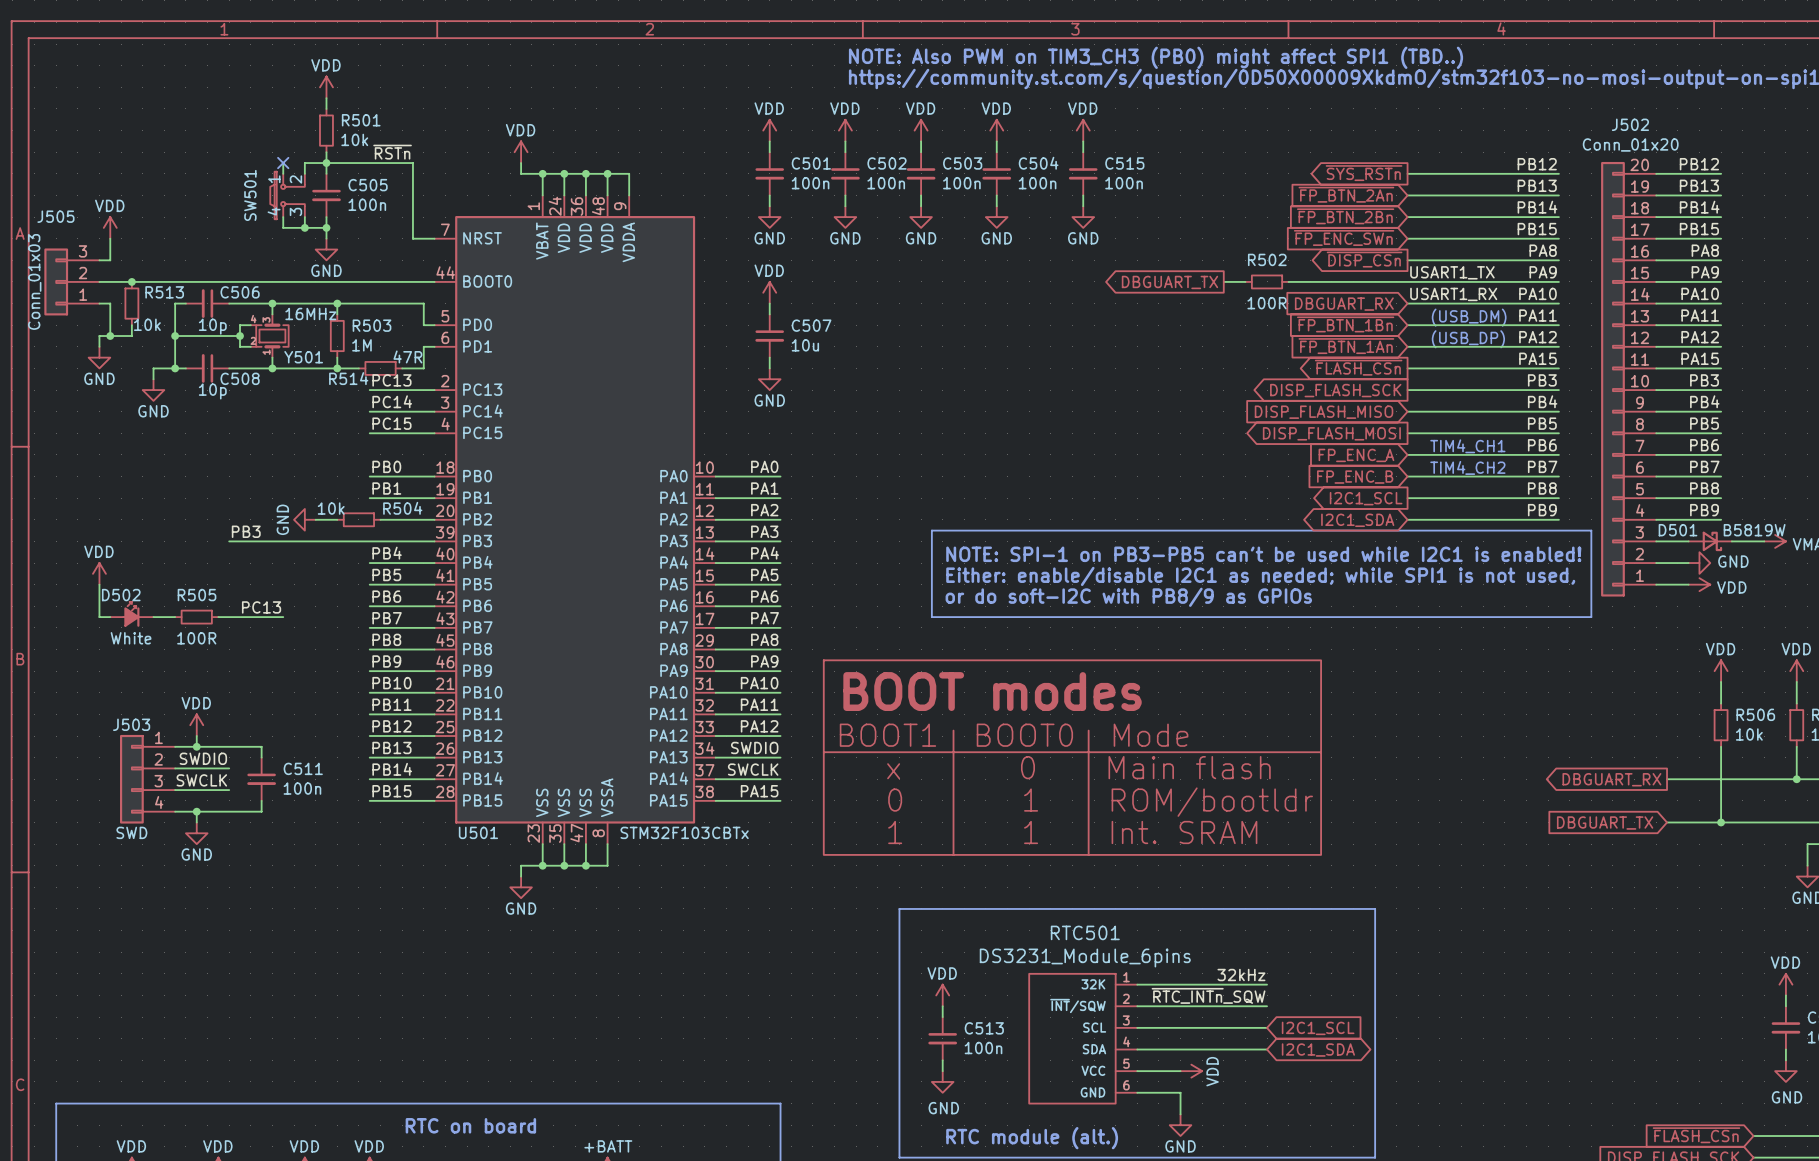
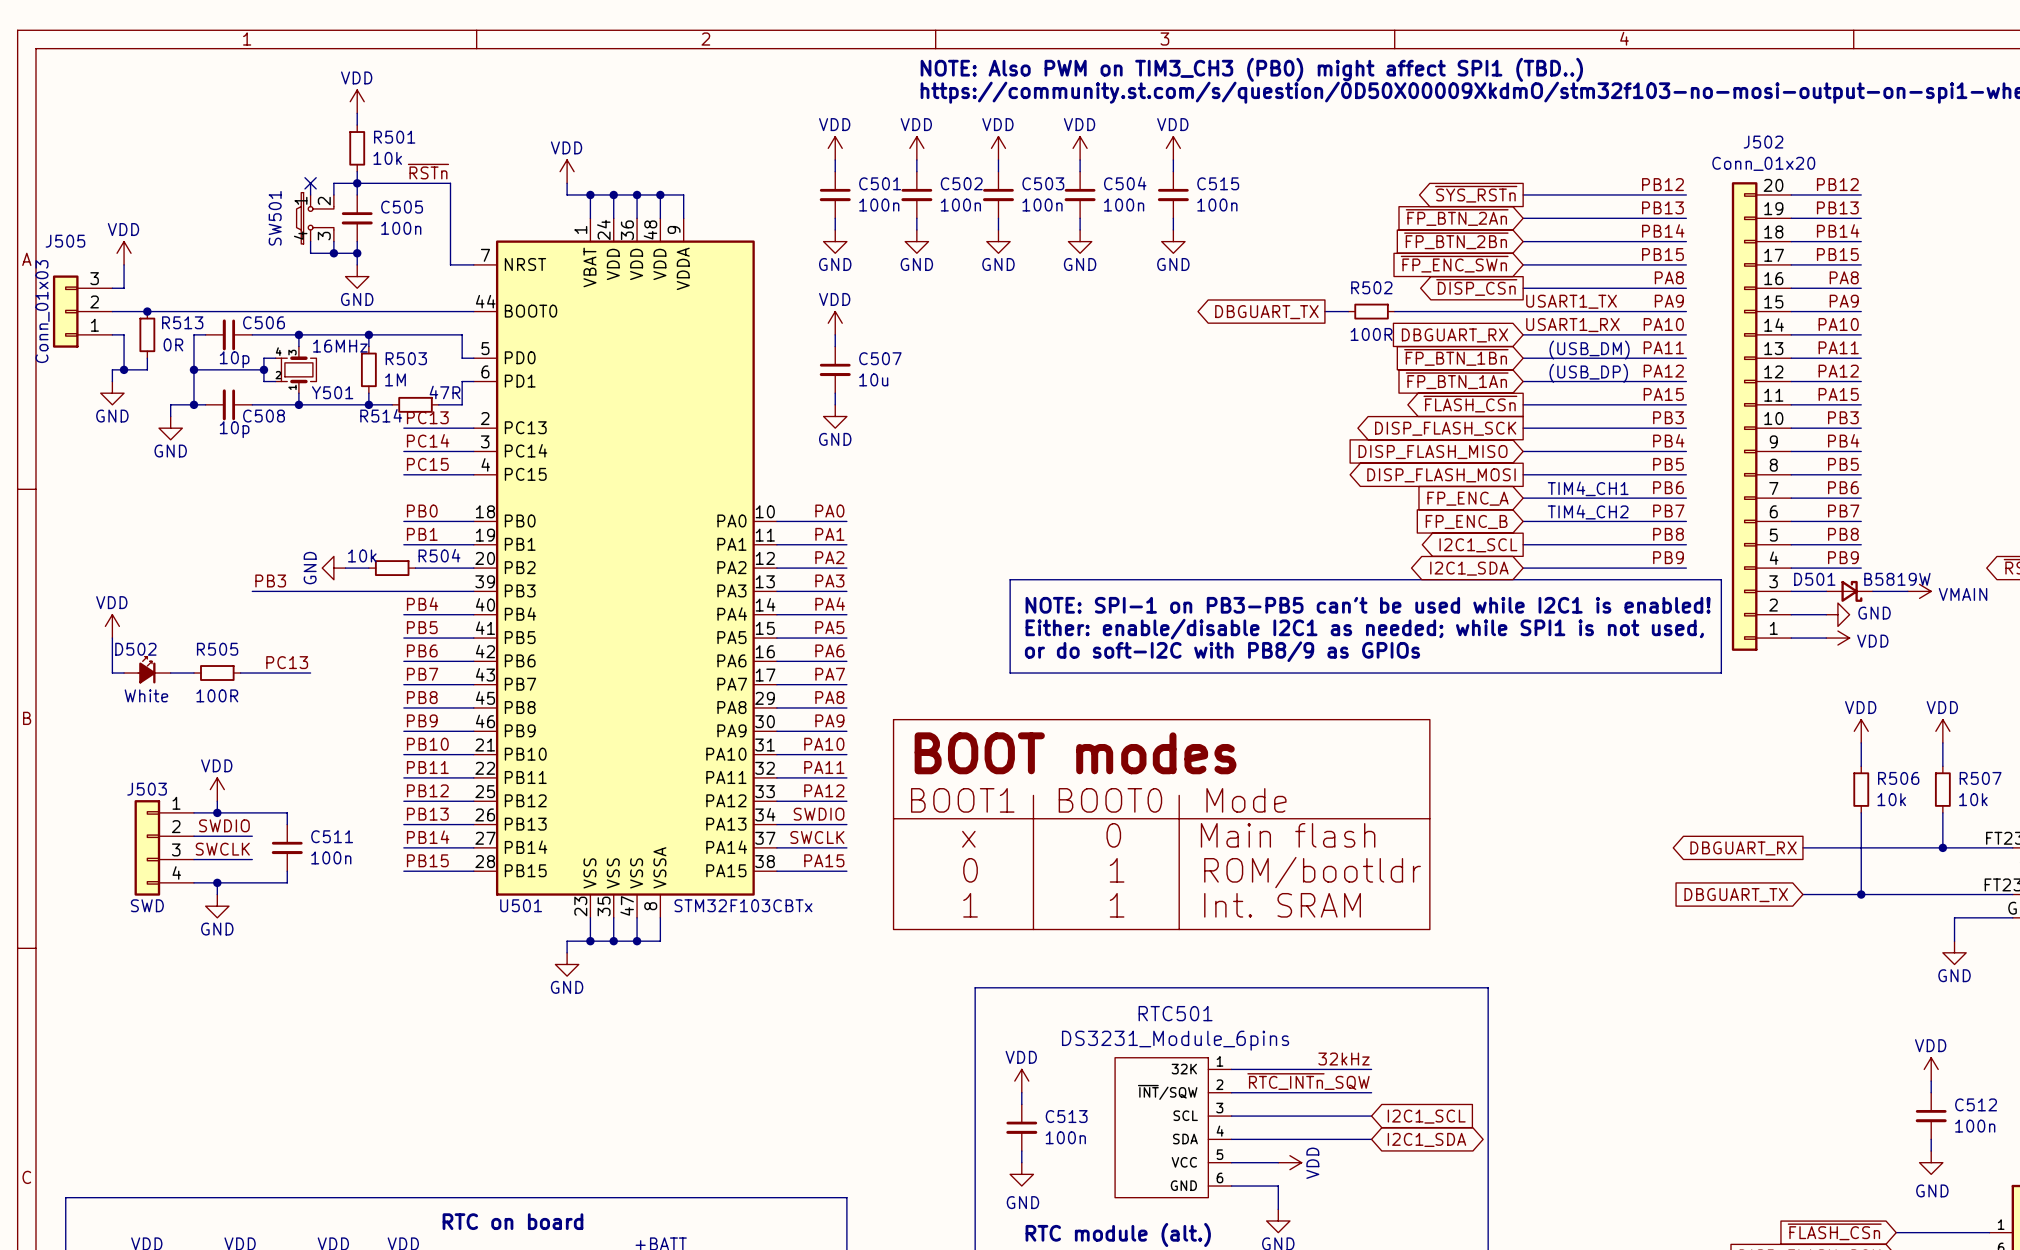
R513 value: 10k (147, 324) -> 0R (173, 344)

